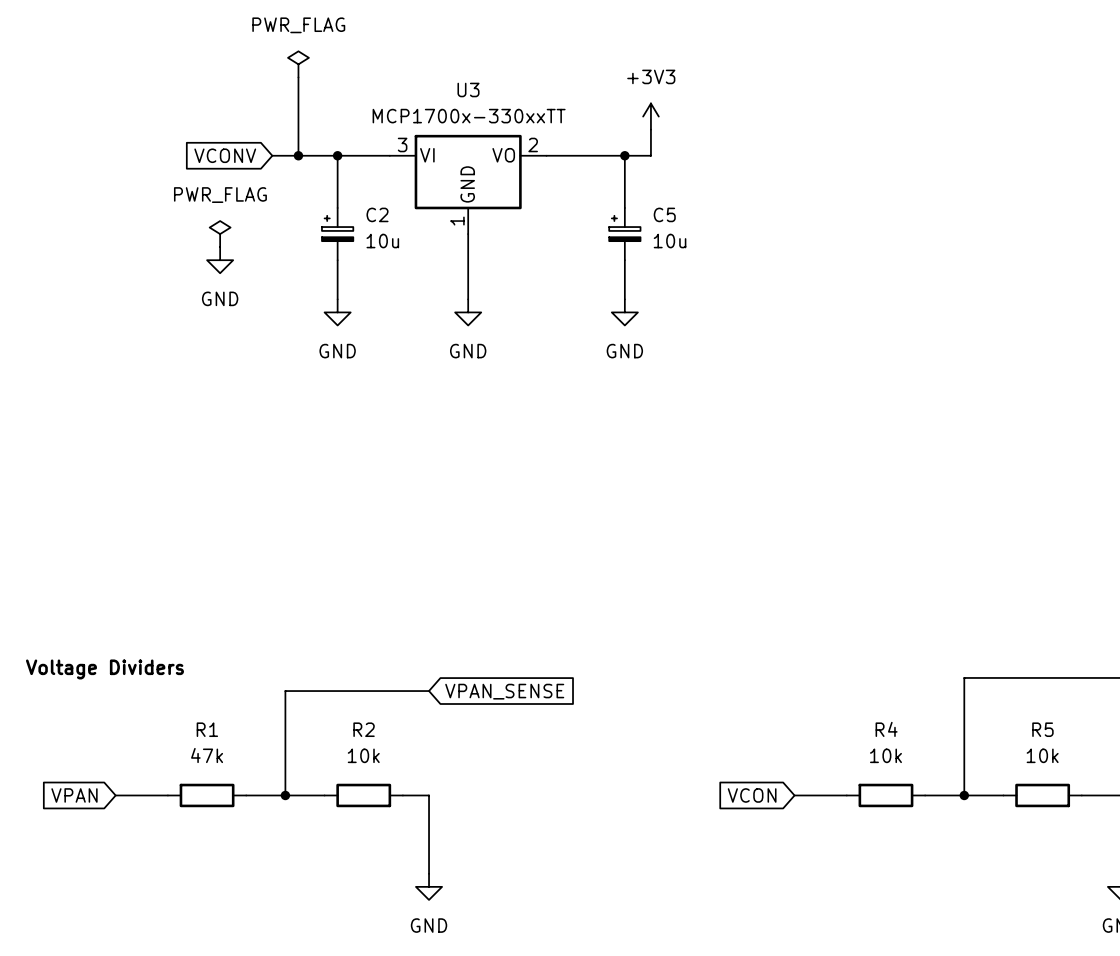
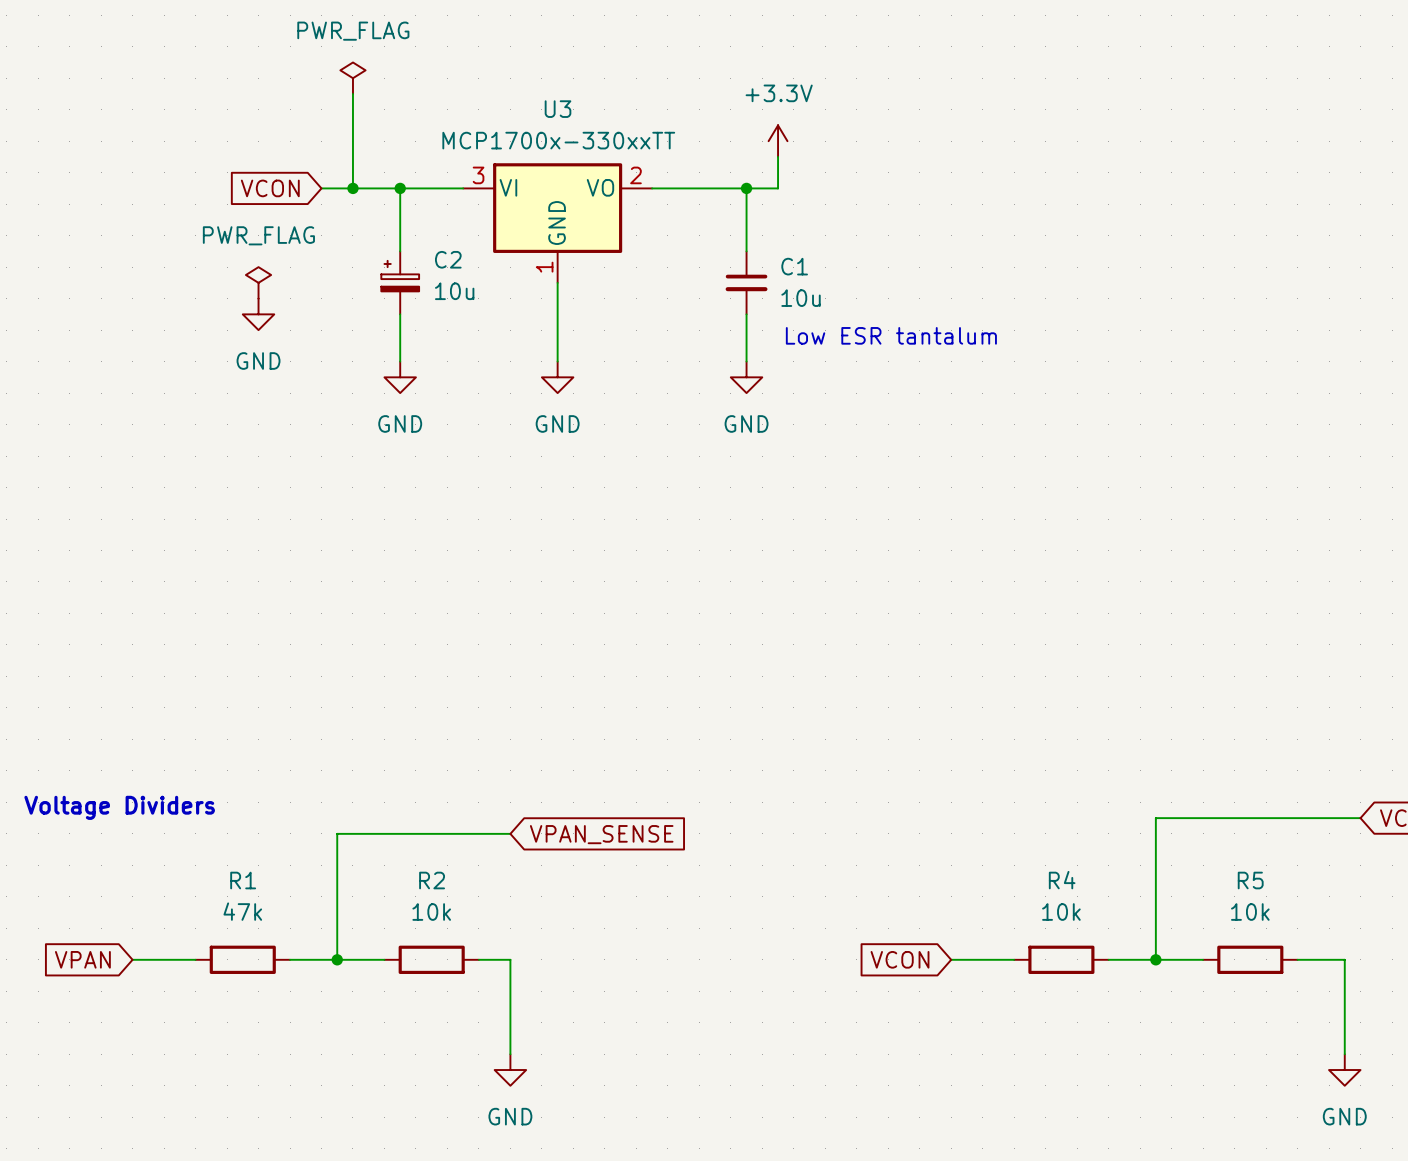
power symbol: +3V3 (650, 116) -> +3.3V (778, 141)
global label: VCONV (225, 155) -> VCON (270, 188)
C5: 10u (624, 234) -> none
C1: none -> 10u (746, 282)
text: none -> Low ESR tantalum (891, 335)

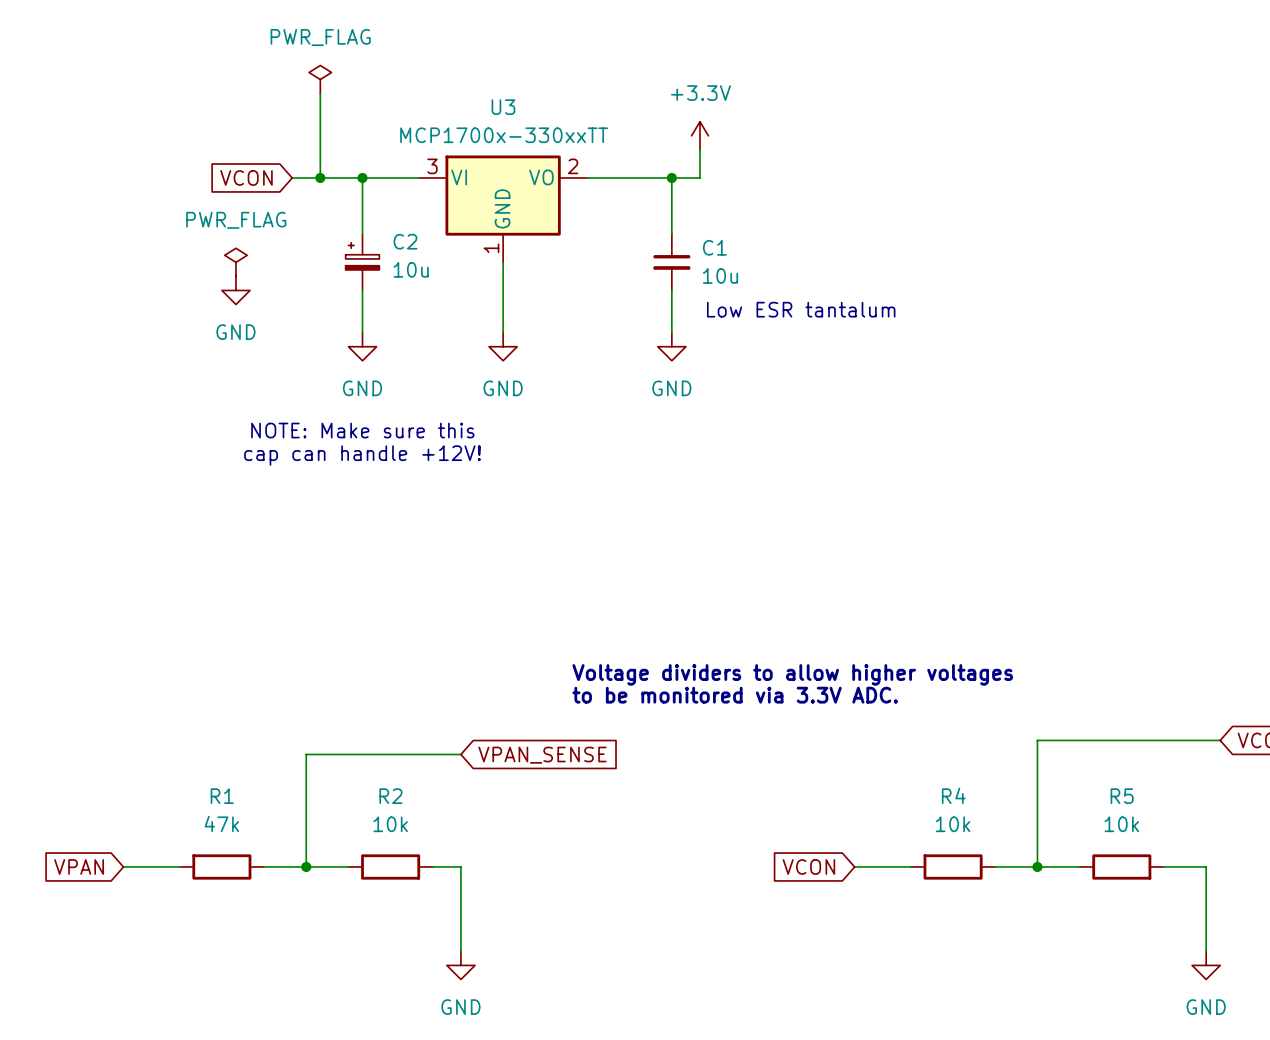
text: none -> NOTE: Make sure this (362, 430)
text: none -> cap can handle +12V! (362, 455)
text: none -> Voltage dividers to allow higher voltages (792, 674)
text: none -> to be monitored via 3.3V ADC. (735, 695)
text: Voltage Dividers (119, 807) -> none

